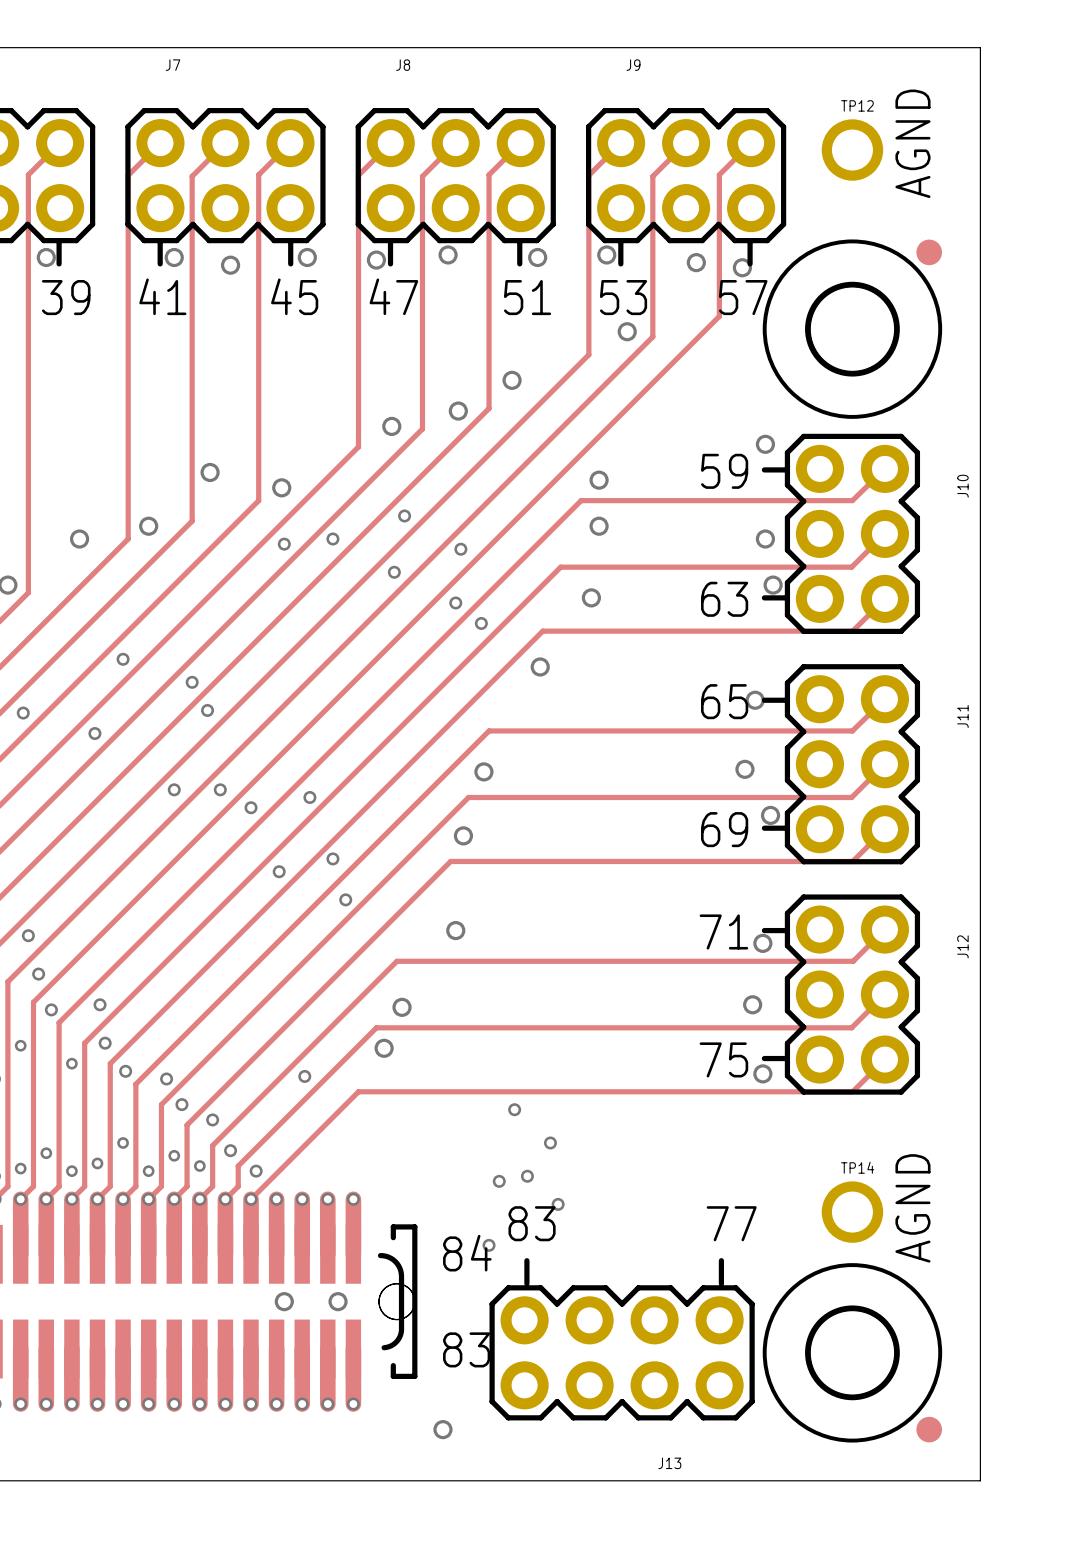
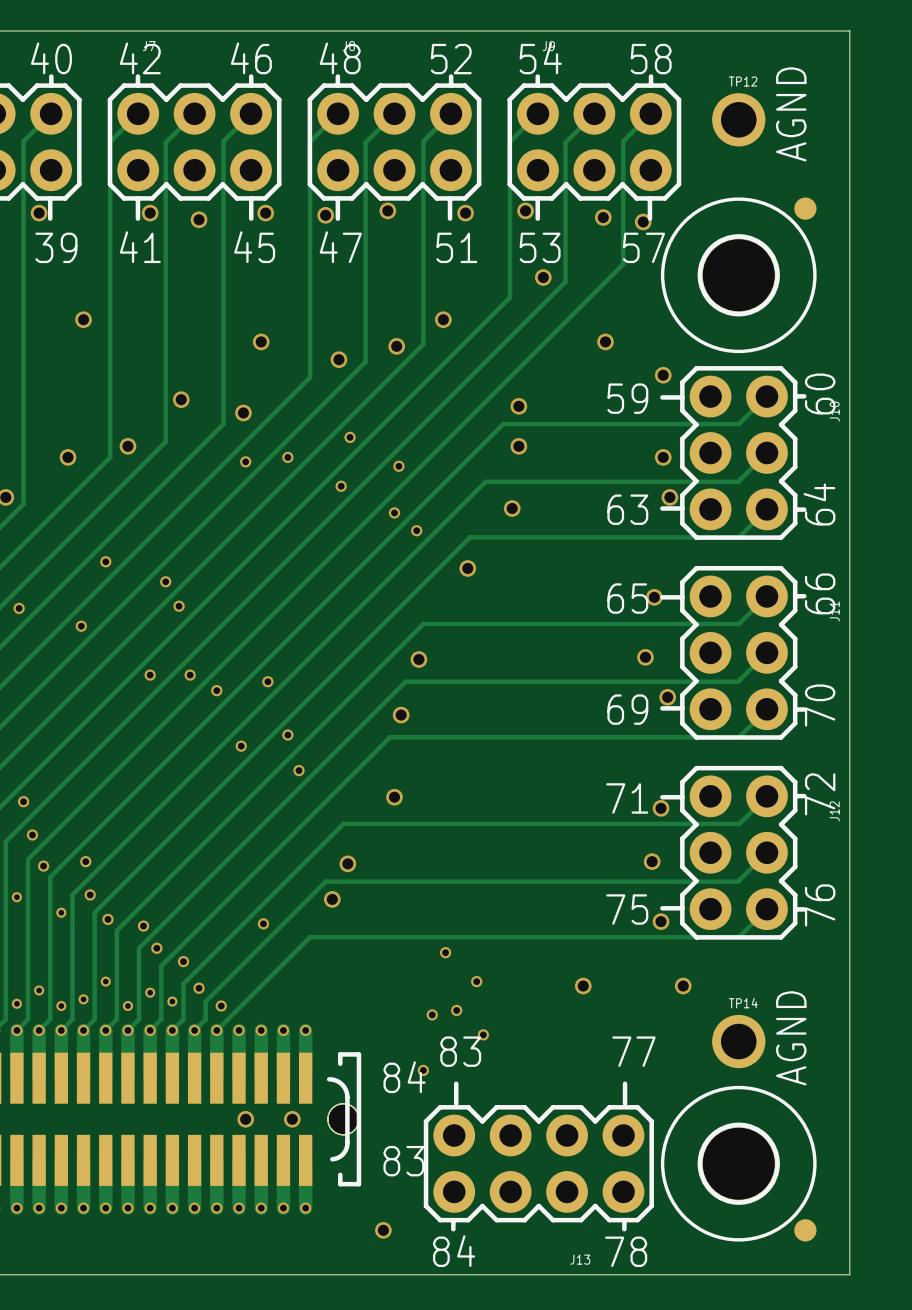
text: none -> 40 (51, 58)
text: none -> 42 (140, 58)
text: none -> 46 (251, 58)
text: none -> 48 (340, 58)
text: none -> 54 (540, 58)
text: none -> 52 (451, 59)
text: none -> 58 (651, 59)
line: none -> (51, 76) (51, 85)
line: none -> (137, 76) (137, 85)
line: none -> (251, 76) (251, 85)
line: none -> (337, 76) (337, 85)
line: none -> (451, 76) (451, 85)
line: none -> (537, 76) (537, 85)
line: none -> (651, 76) (651, 85)
via: none -> (83, 319)
via: none -> (261, 341)
via: none -> (605, 341)
text: none -> 60 (820, 393)
line: none -> (795, 396) (804, 396)
text: none -> 64 (819, 504)
line: none -> (795, 509) (804, 509)
text: none -> 66 (820, 593)
line: none -> (795, 596) (804, 596)
text: none -> 70 (820, 705)
line: none -> (795, 709) (804, 709)
text: none -> 72 (820, 794)
line: none -> (795, 796) (804, 796)
text: none -> 76 (820, 905)
line: none -> (795, 909) (804, 909)
via: none -> (583, 986)
via: none -> (683, 986)
line: none -> (453, 1220) (453, 1229)
line: none -> (624, 1220) (624, 1229)
text: none -> 84 (454, 1251)
text: none -> 78 (626, 1251)

